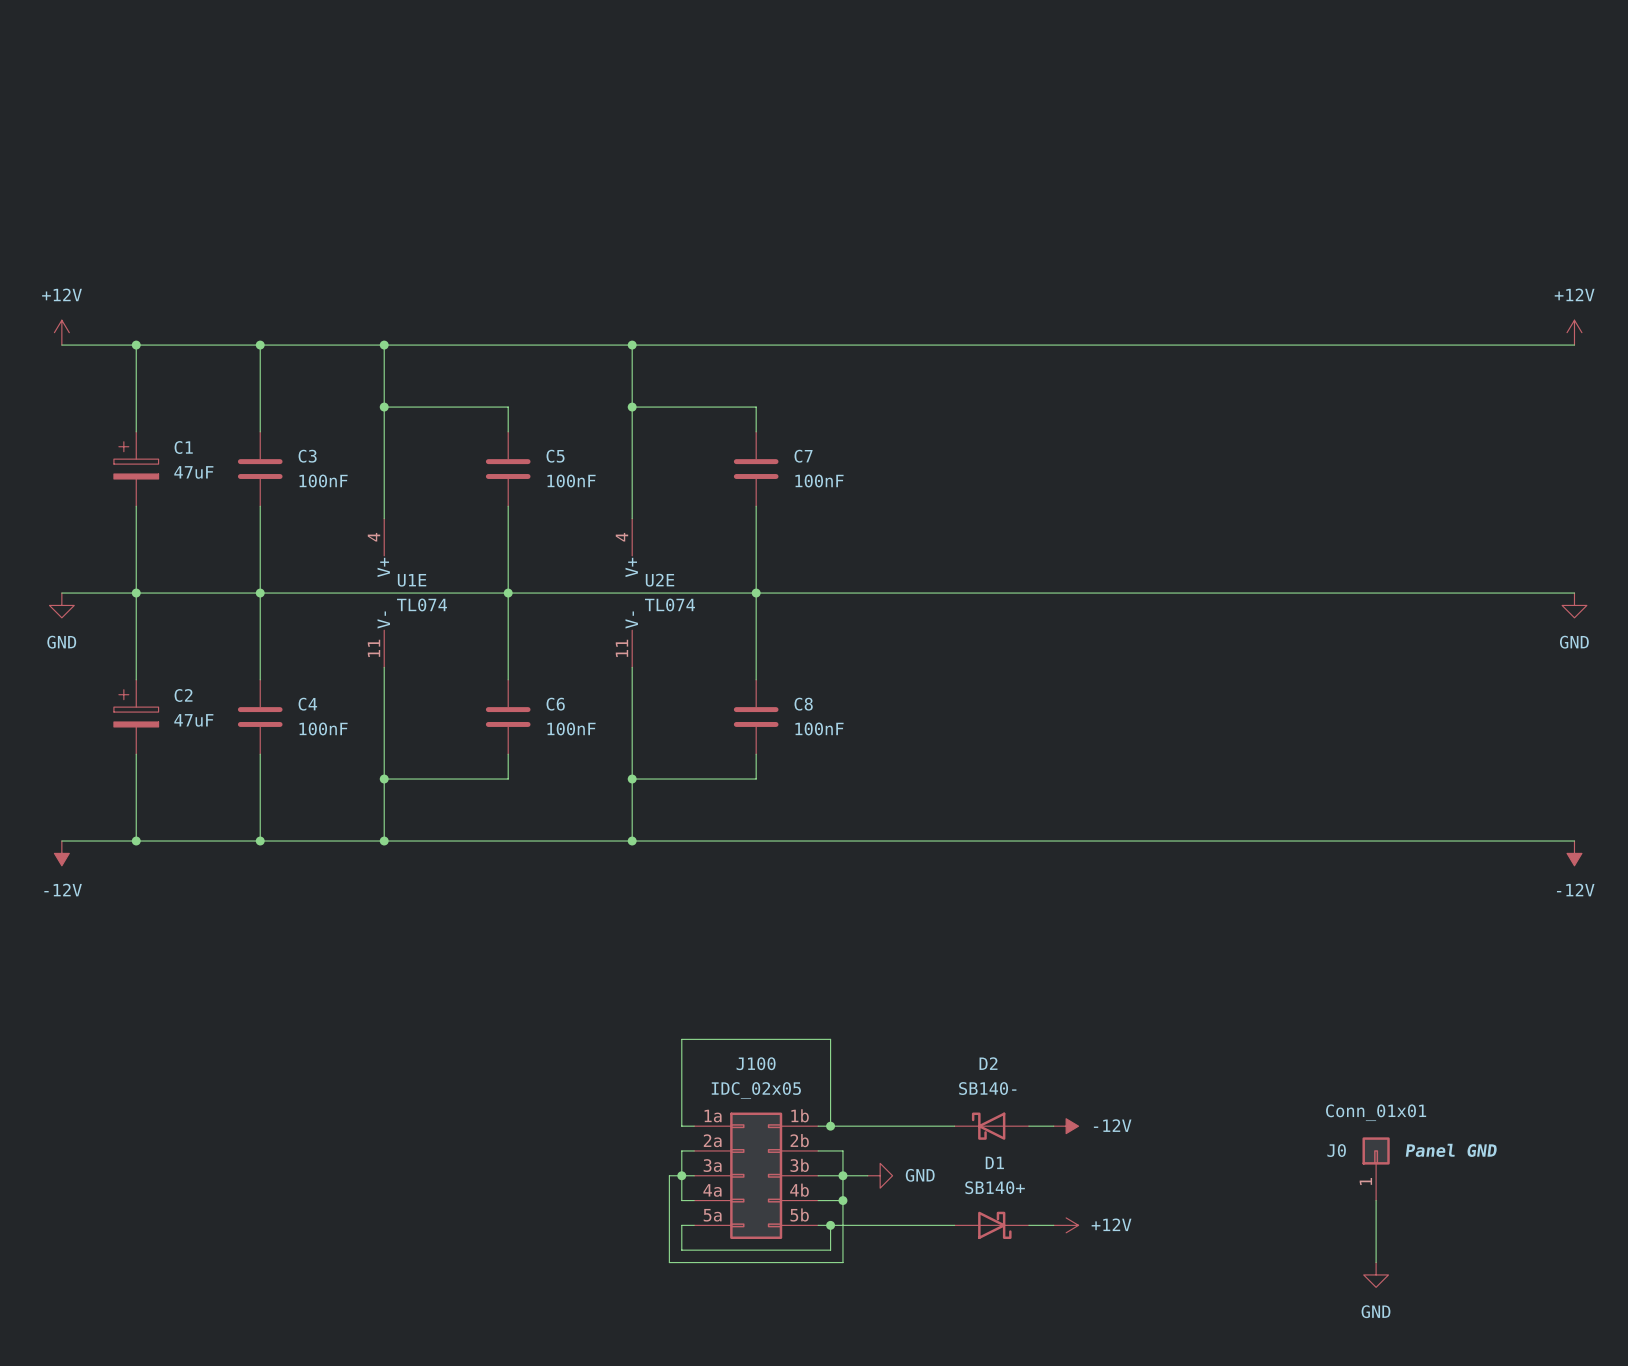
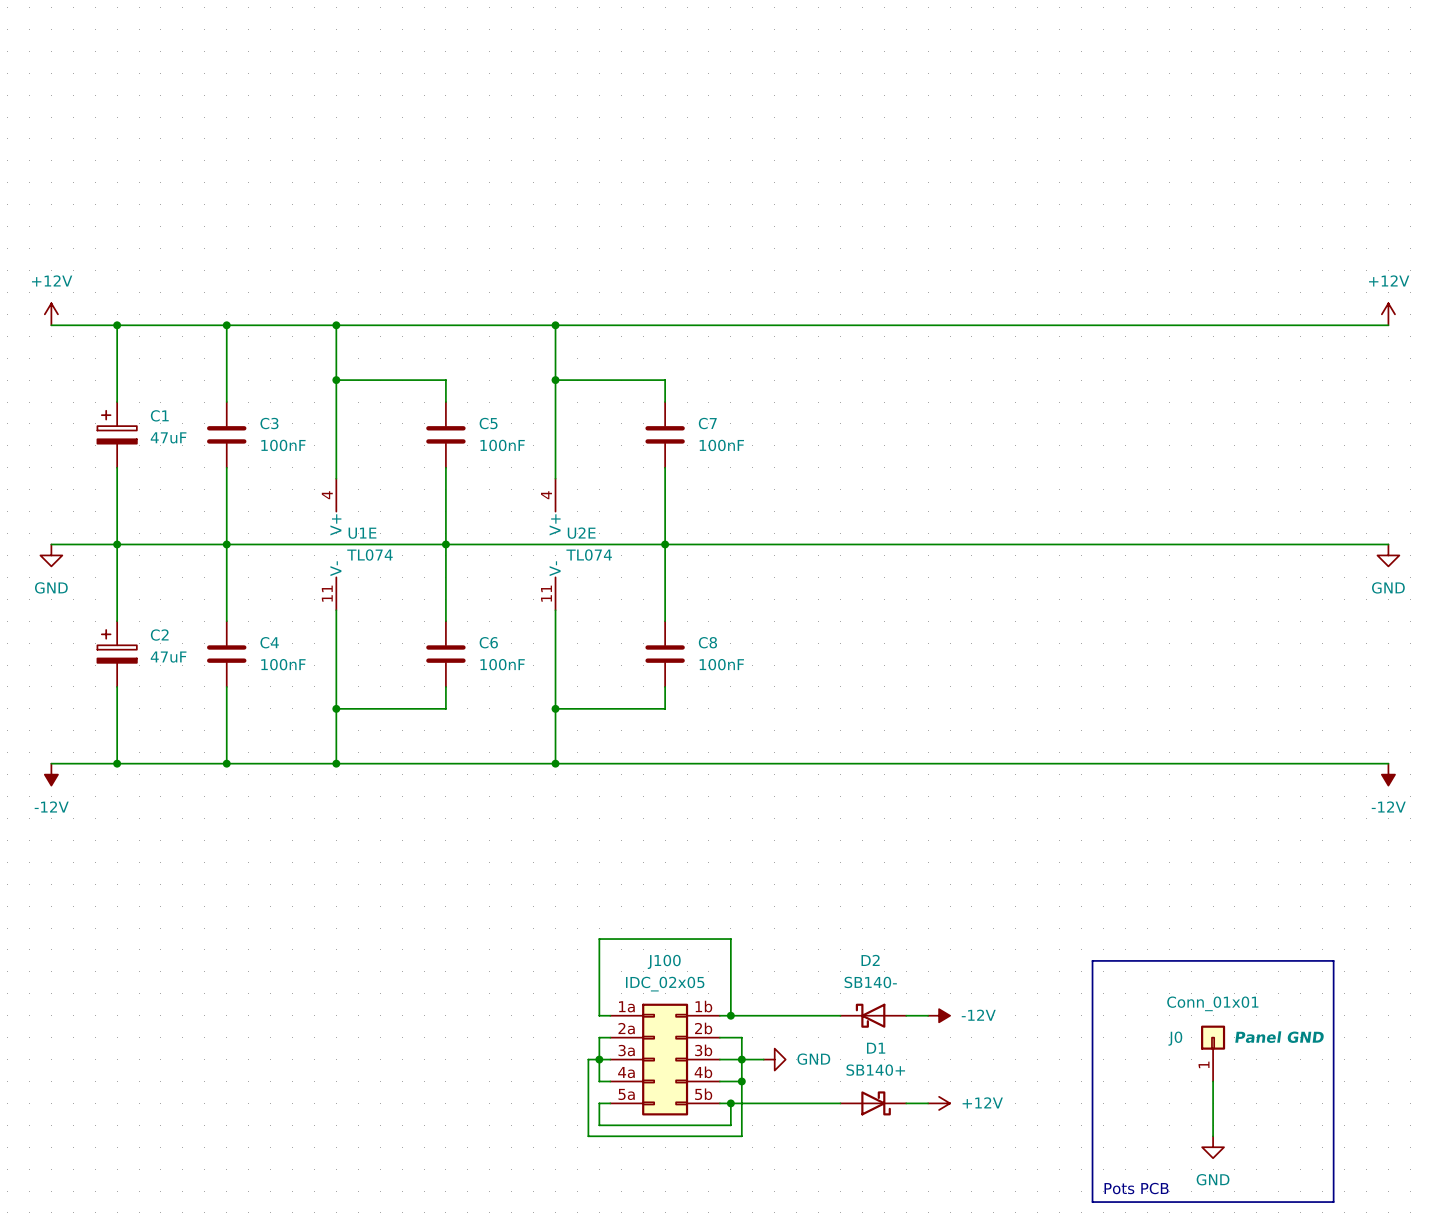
line: none -> (1092, 960) (1333, 960) (1333, 1202) (1092, 1202) (1092, 960)
text: none -> Pots PCB (1136, 1188)

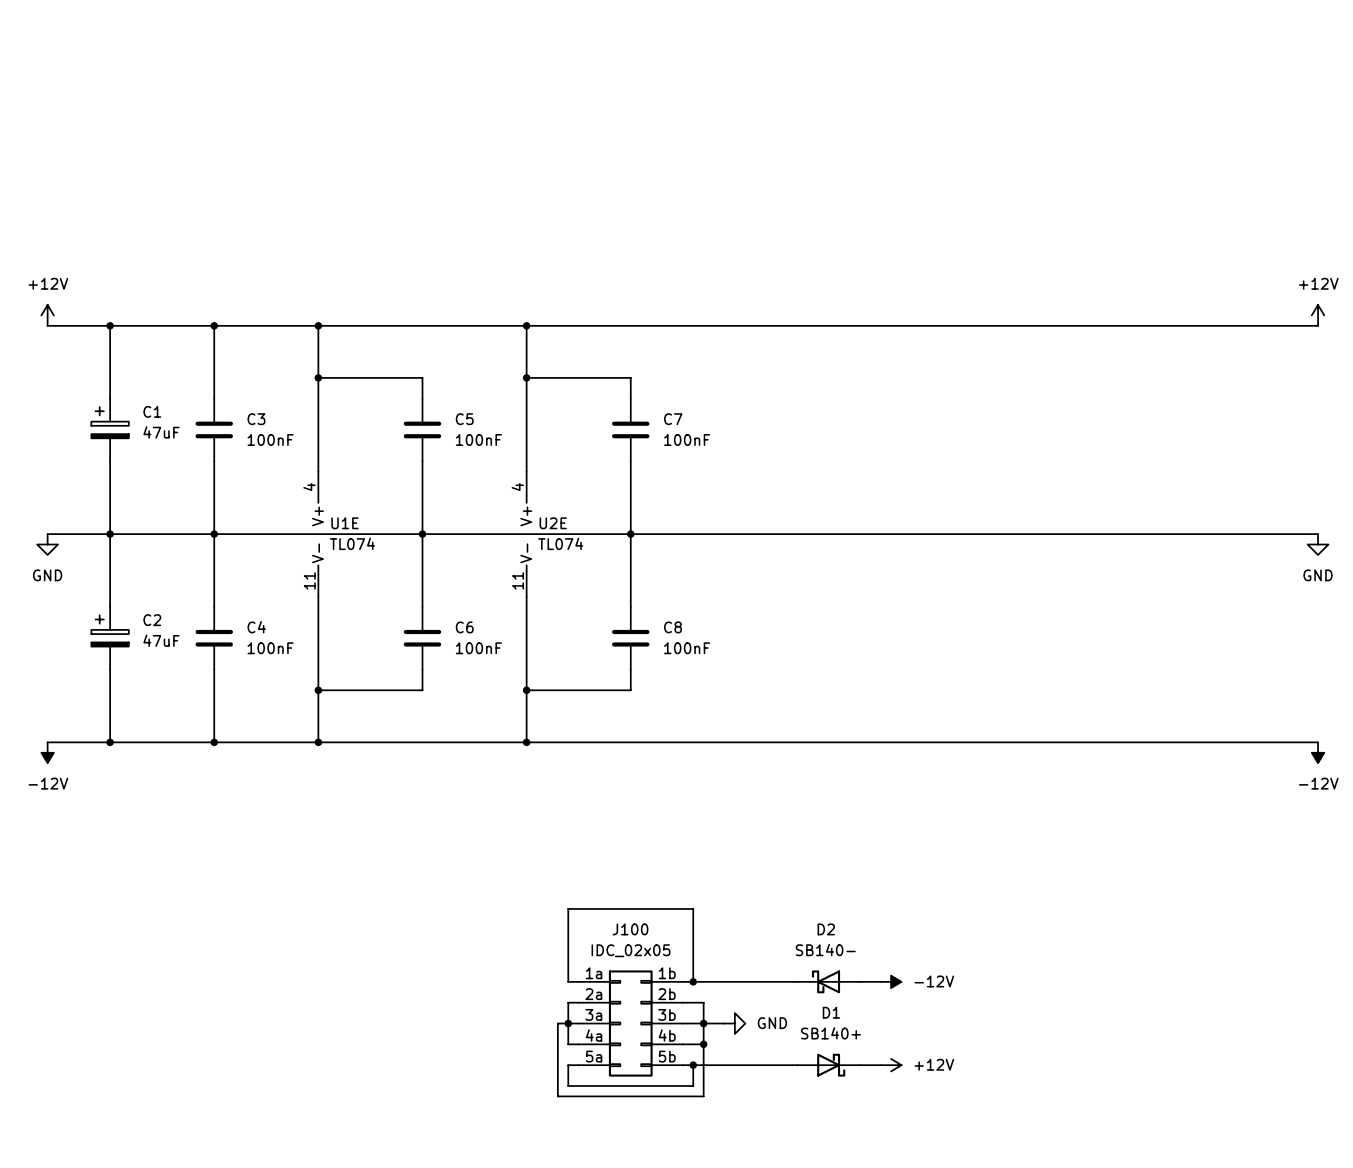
line: (1092, 960) (1333, 960) (1333, 1202) (1092, 1202) (1092, 960) -> none
J0: Conn_01x01 (1213, 1053) -> none
wire: (1213, 1081) (1213, 1136) -> none
power symbol: GND (1213, 1147) -> none
text: Pots PCB (1136, 1188) -> none

